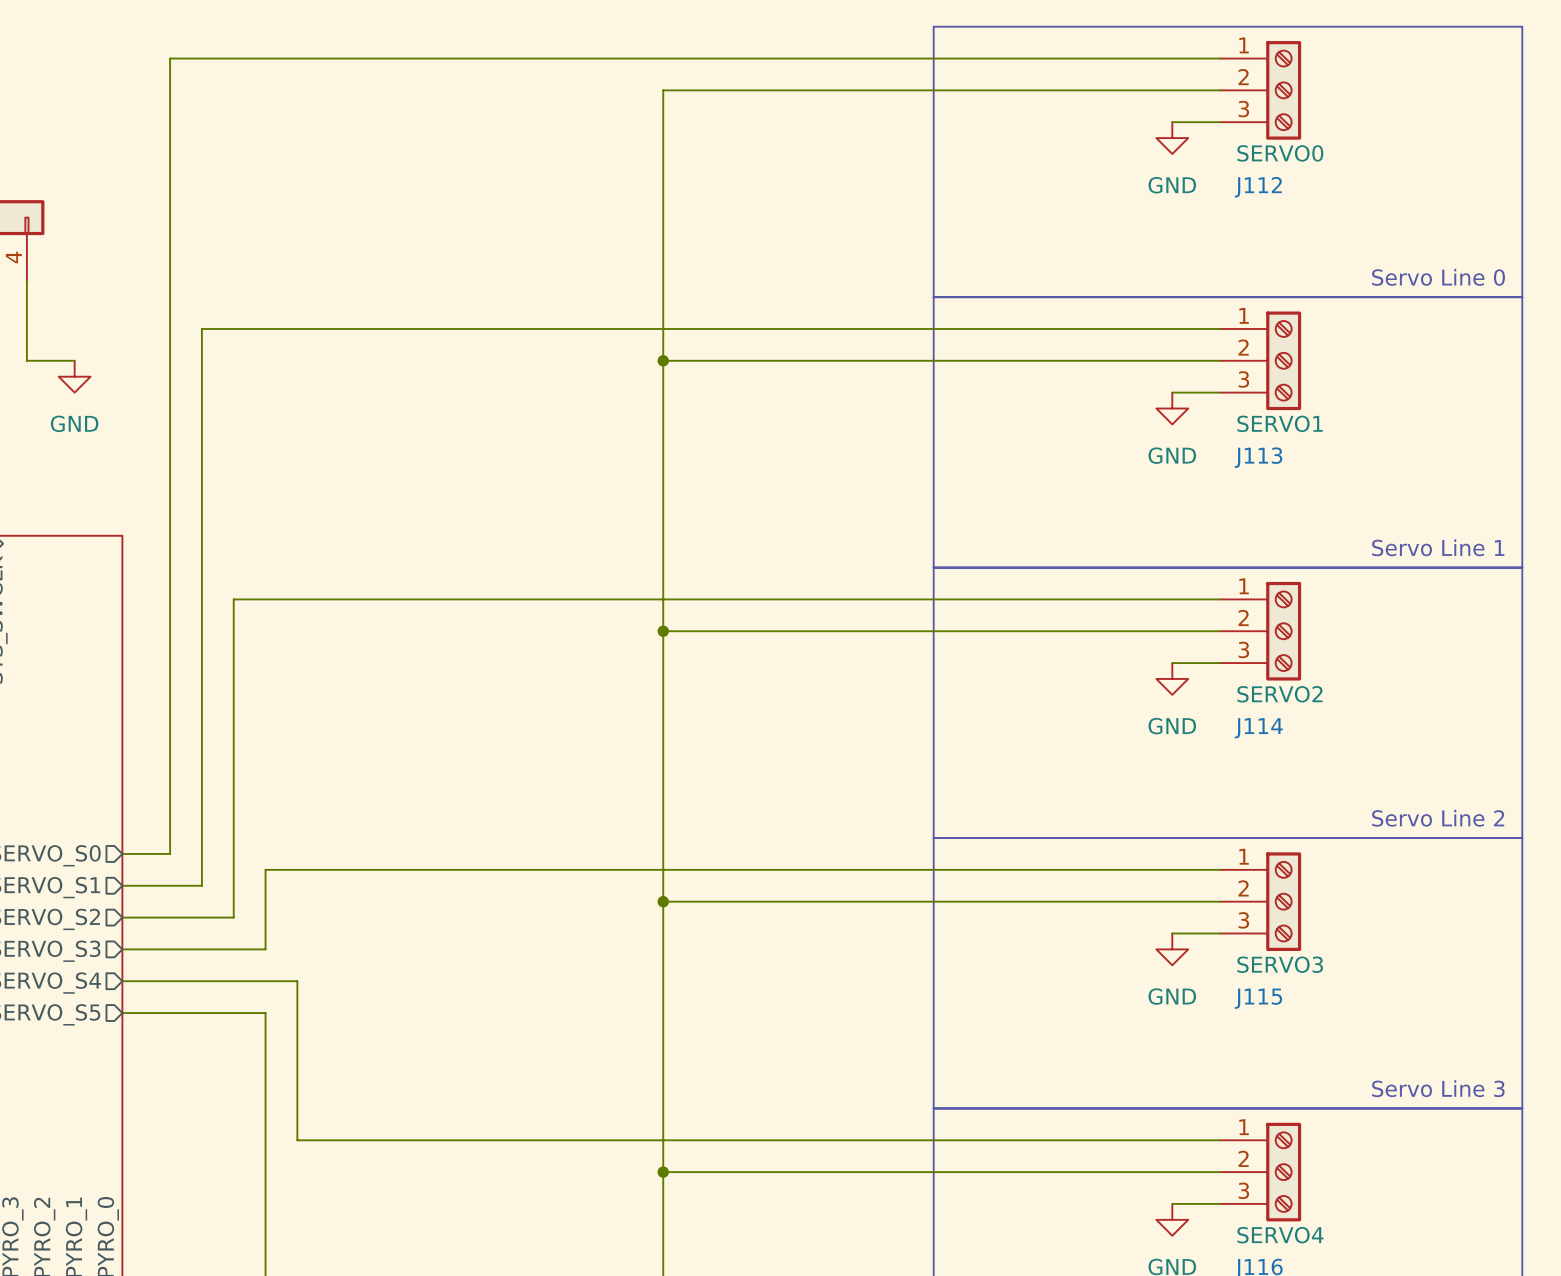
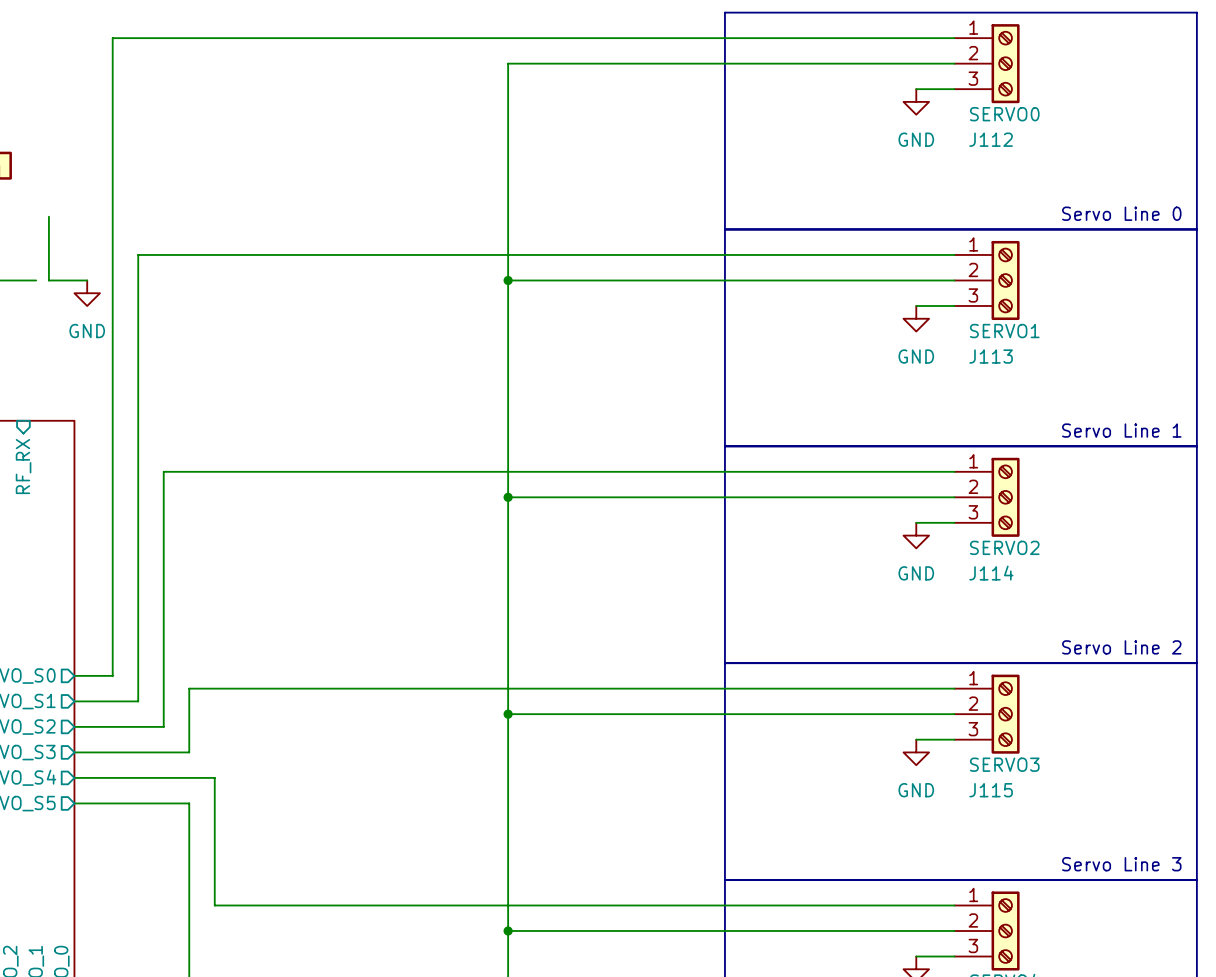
wire: none -> (48, 216) (48, 280) (87, 280)
power symbol position: GND (74, 376) -> GND (87, 293)
sheet pin: none -> RF_RX (23, 466)

